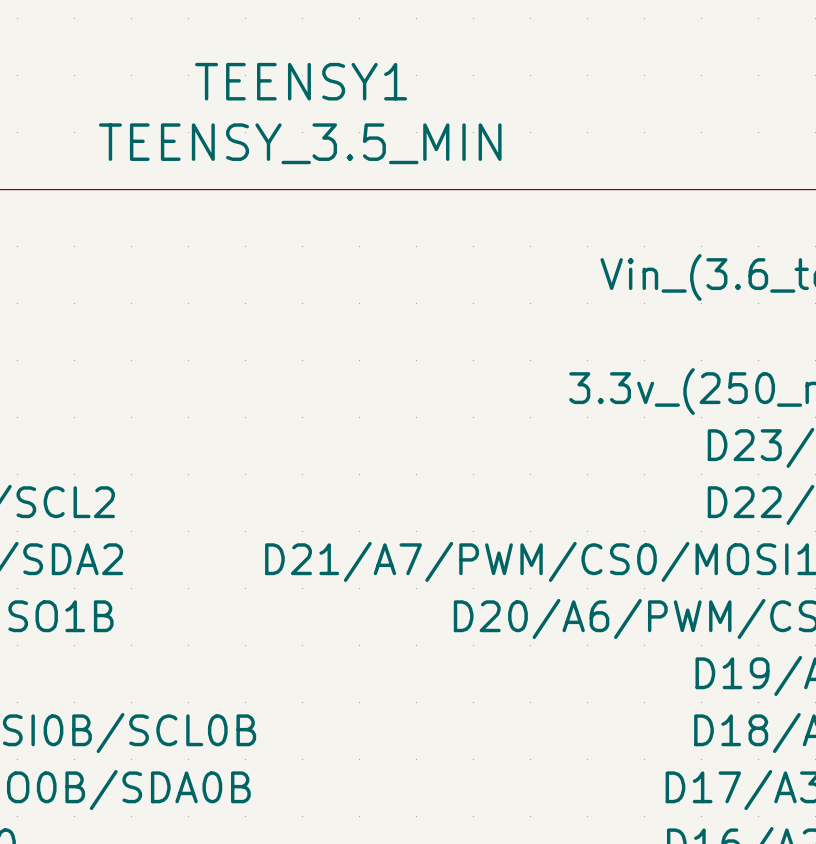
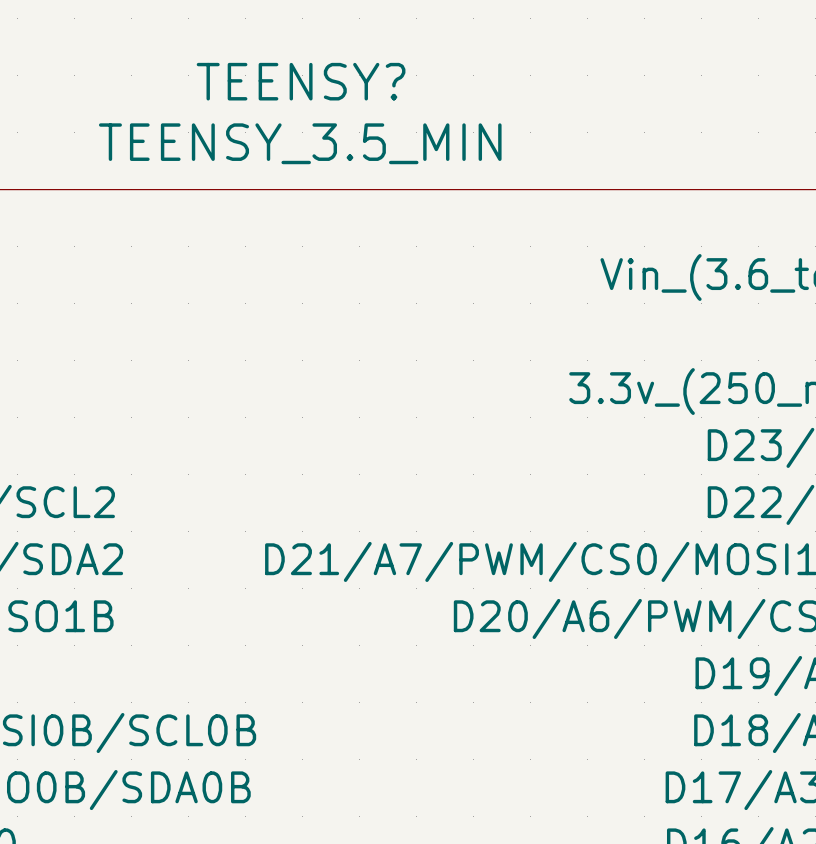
TEENSY1 name: TEENSY1 (301, 81) -> TEENSY? (301, 81)

